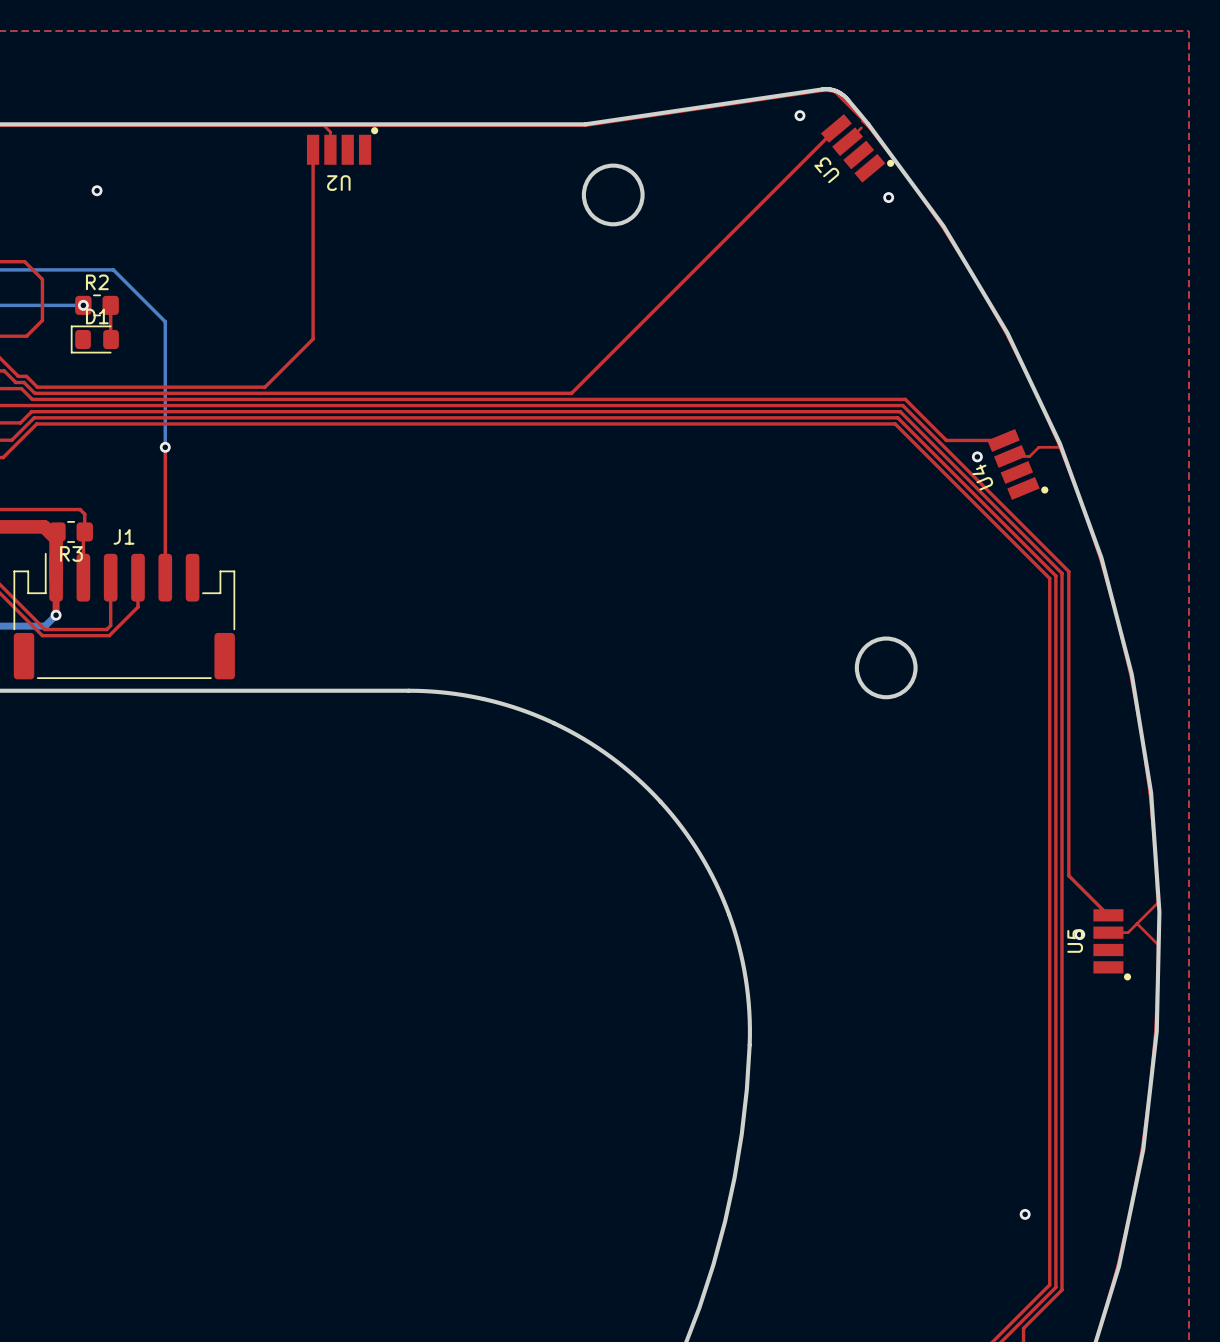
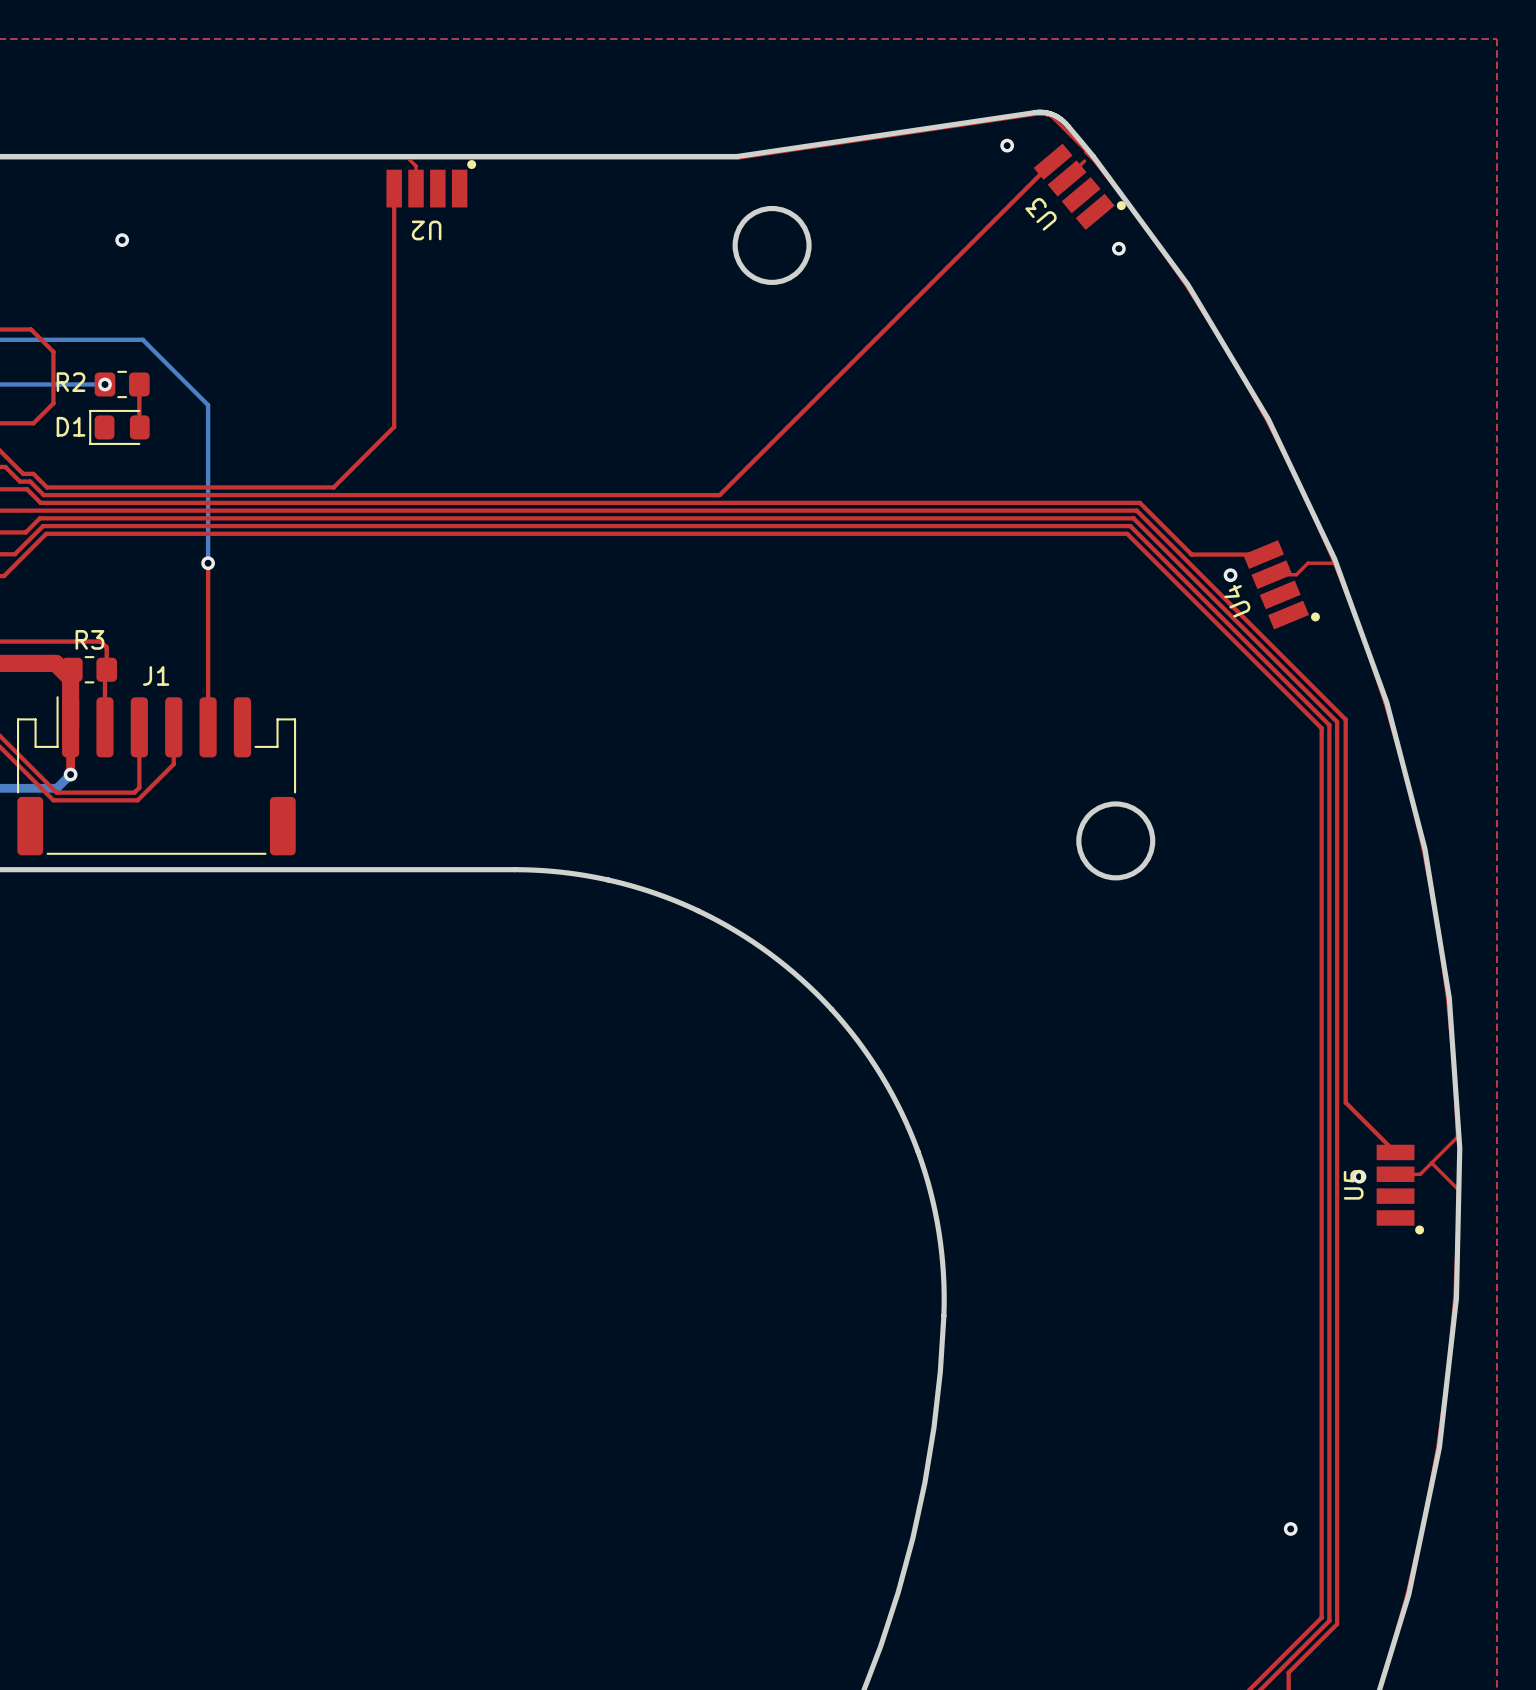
R2 name position: R2 (97, 282) -> R2 (71, 382)
D1 name position: D1 (97, 316) -> D1 (71, 426)
R3 name position: R3 (71, 553) -> R3 (89, 639)

